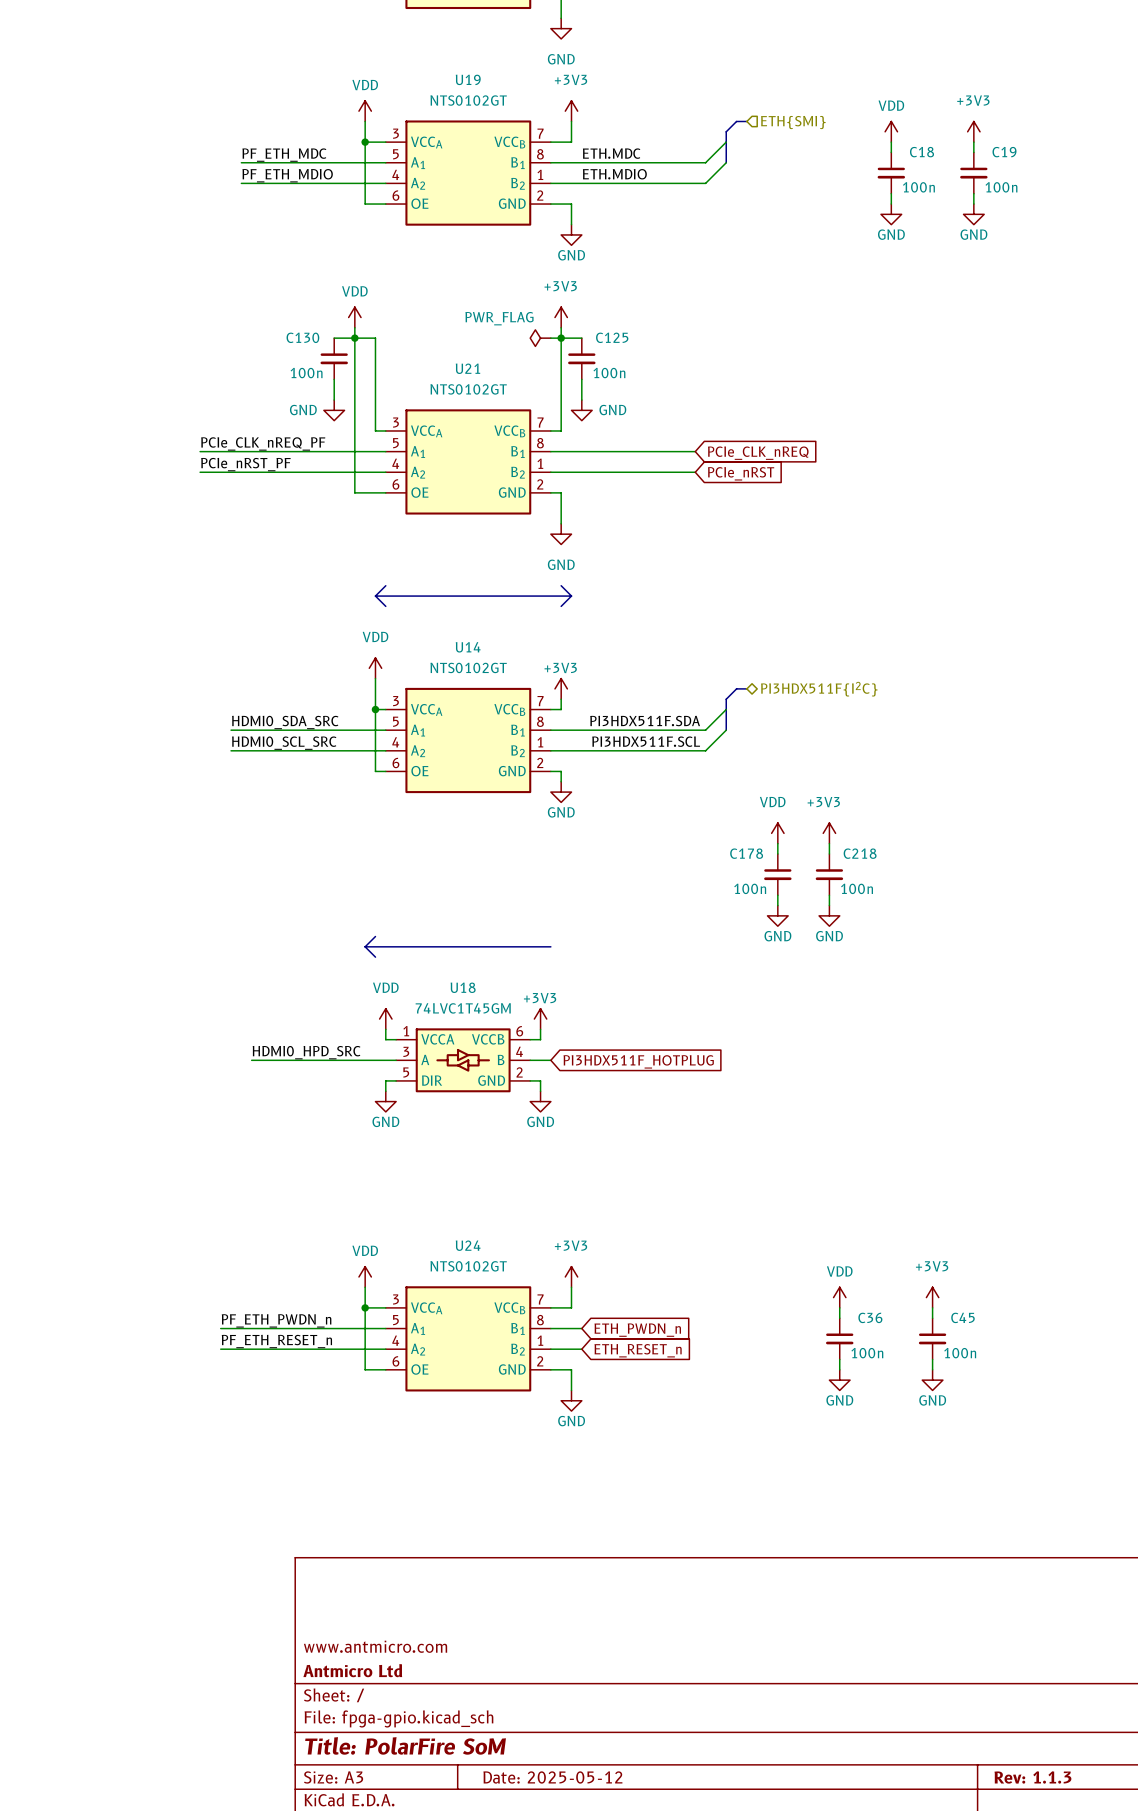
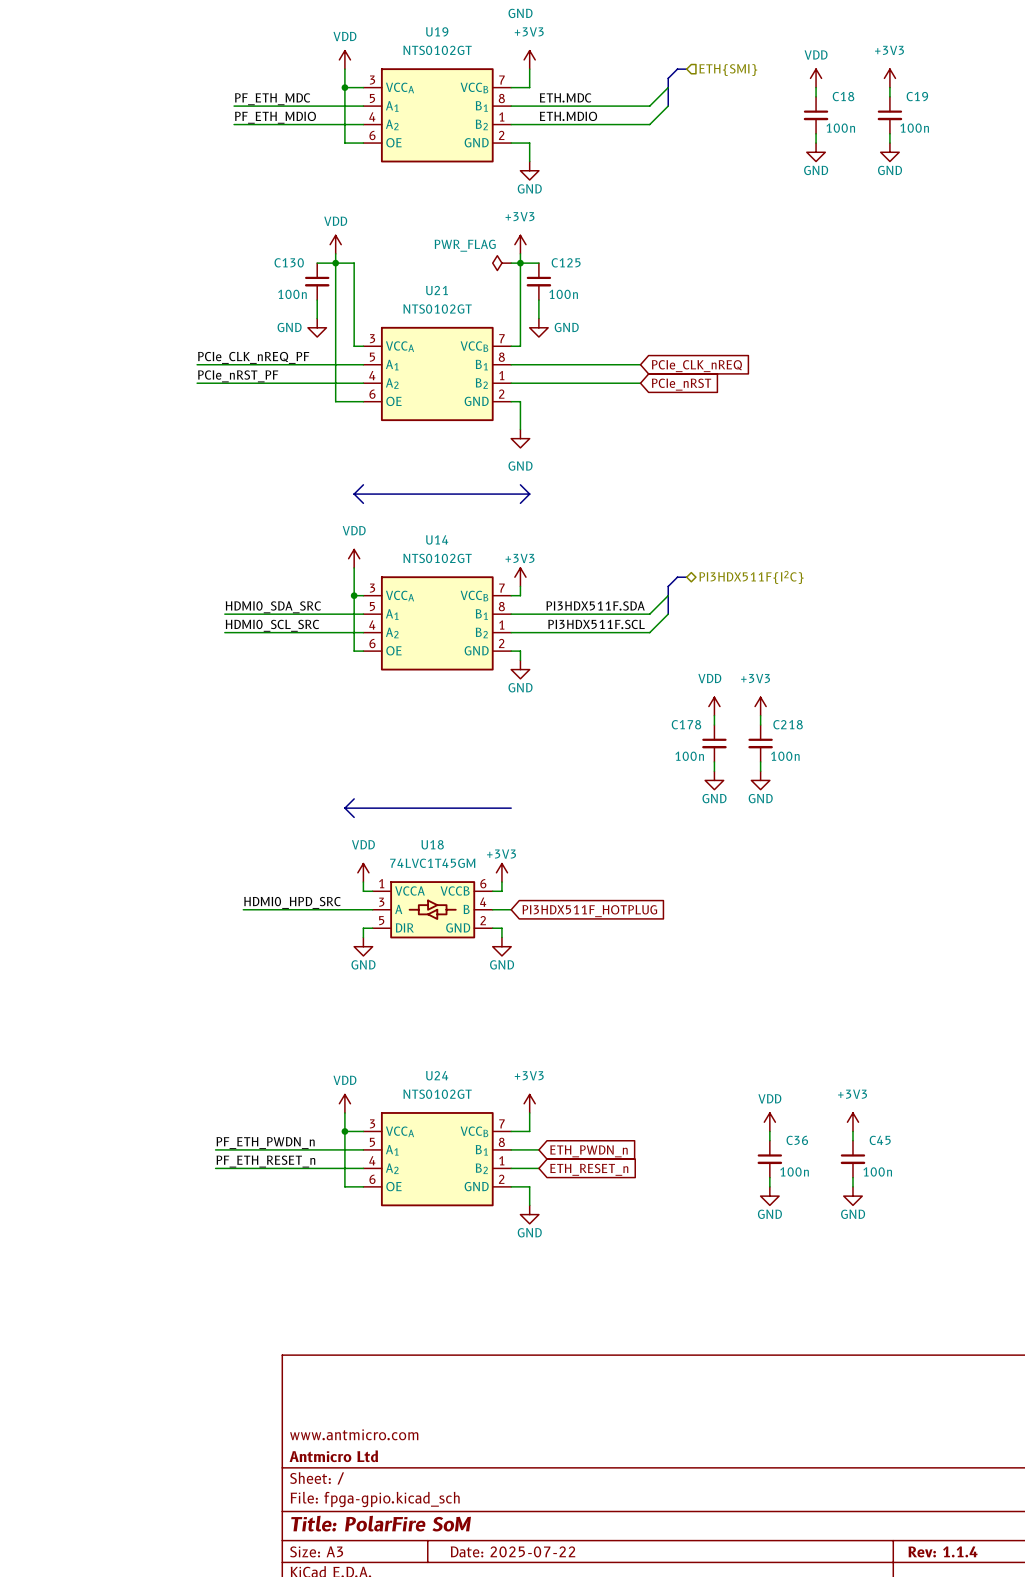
title block: Date: 2025-05-12 (552, 1777) -> Date: 2025-07-22 (513, 1551)
title block: Rev: 1.1.3 (1032, 1777) -> Rev: 1.1.4 (943, 1551)

